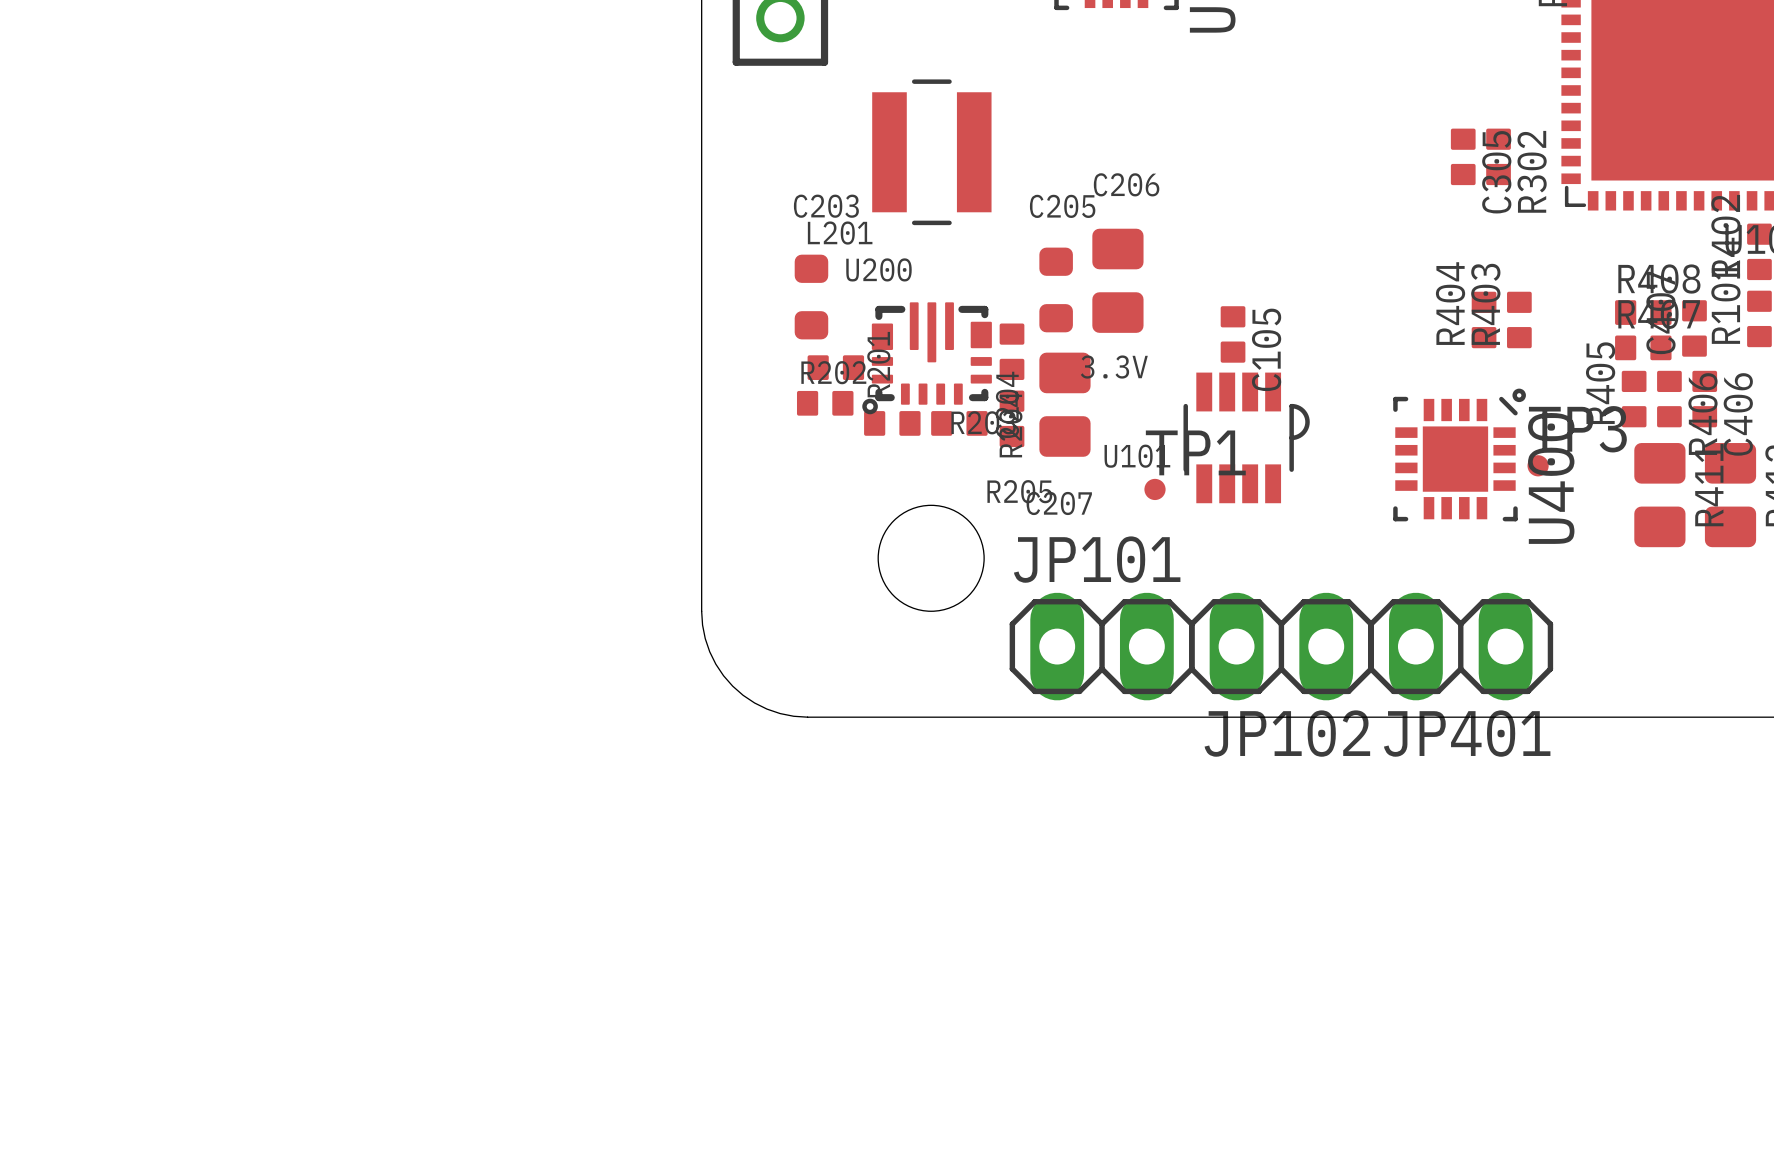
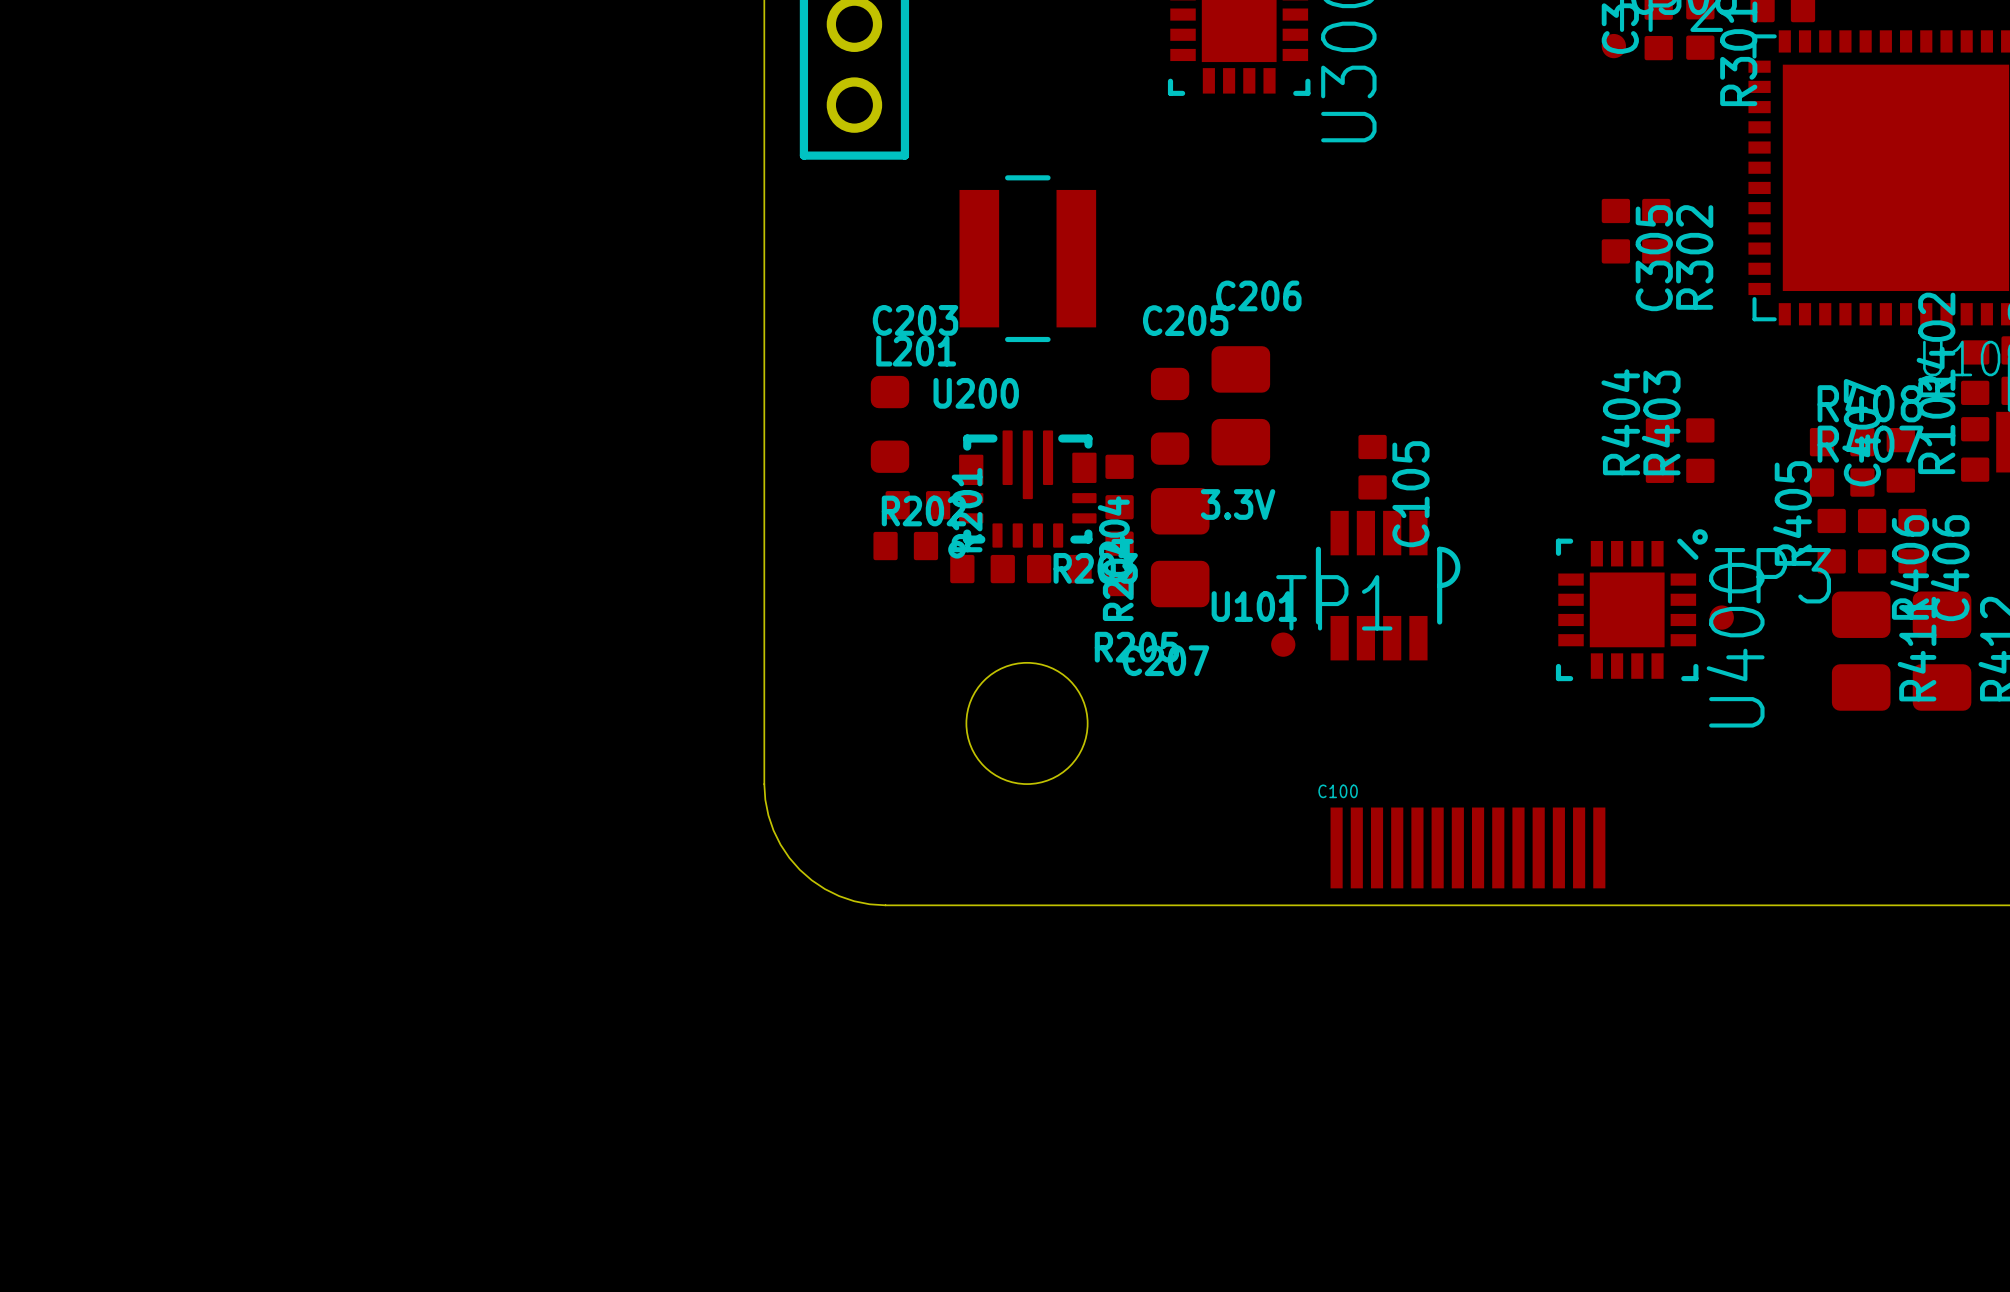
C305 position: (1463, 156) -> (1615, 231)
R302 position: (1498, 156) -> (1656, 231)
JP101: (1102, 646) -> none
JP102: (1281, 646) -> none
JP401: (1460, 646) -> none
C100: none -> (1467, 847)

